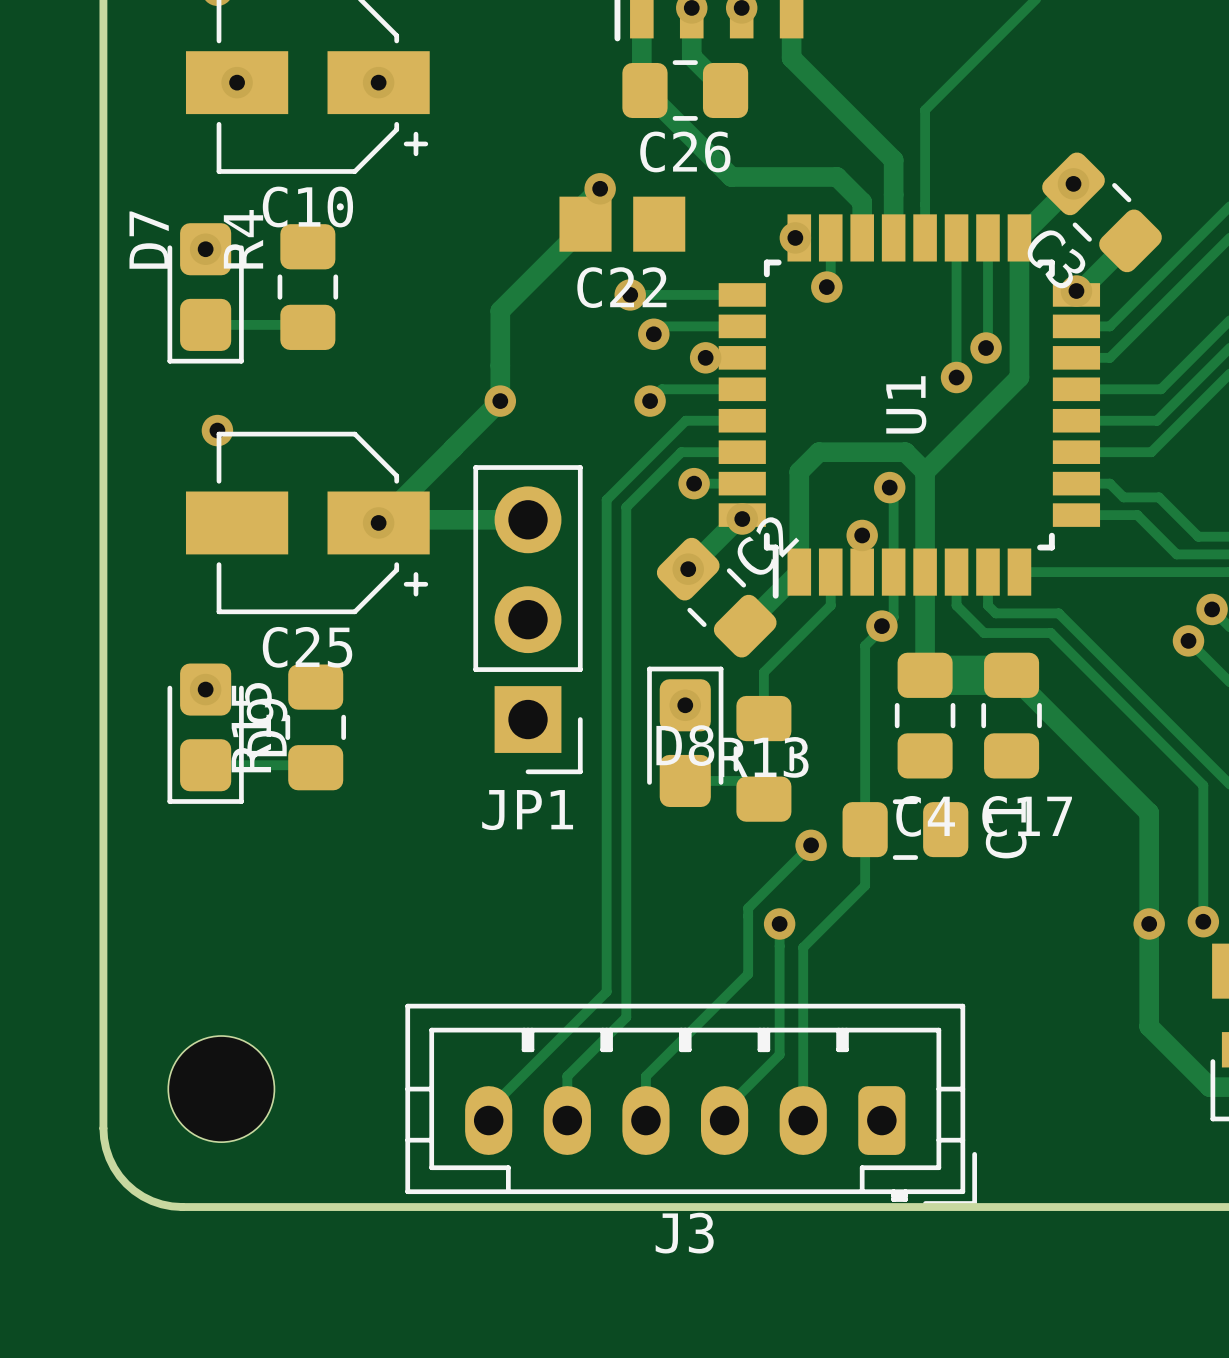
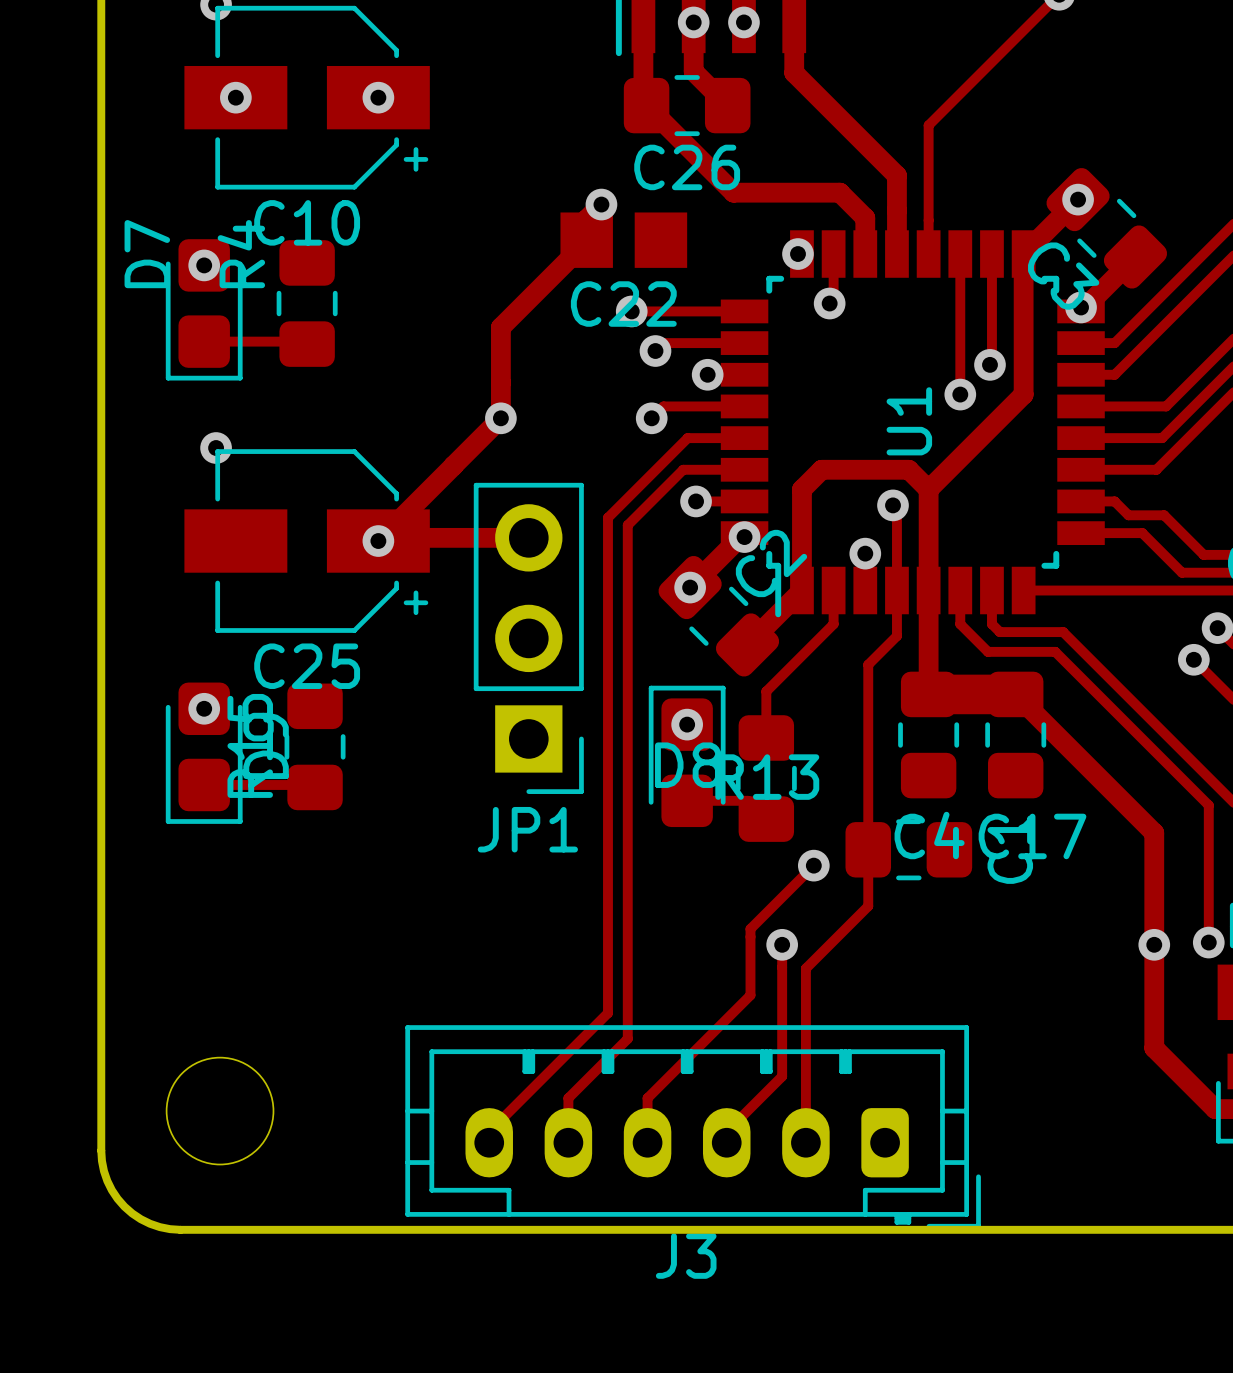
via: (881, 626) -> none

